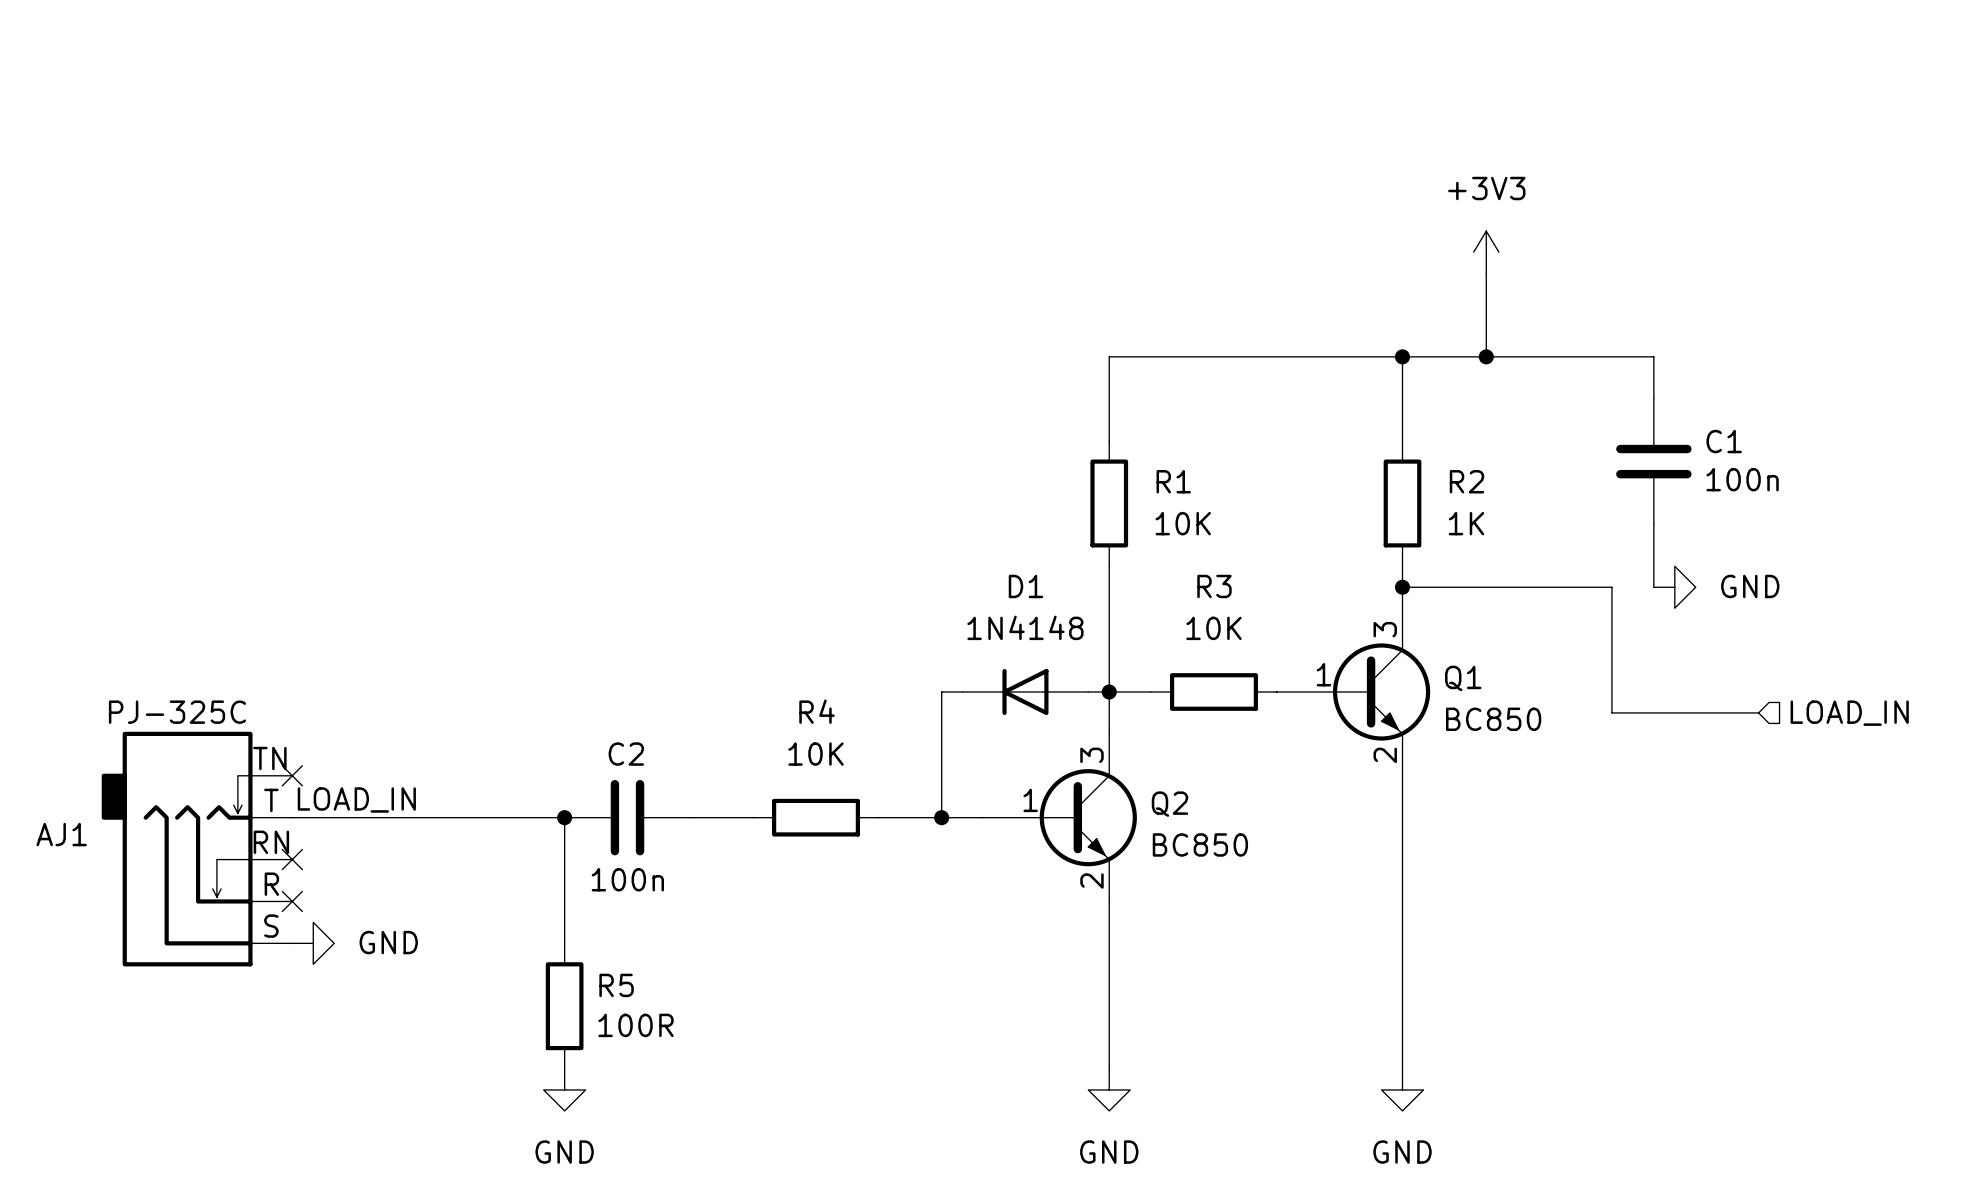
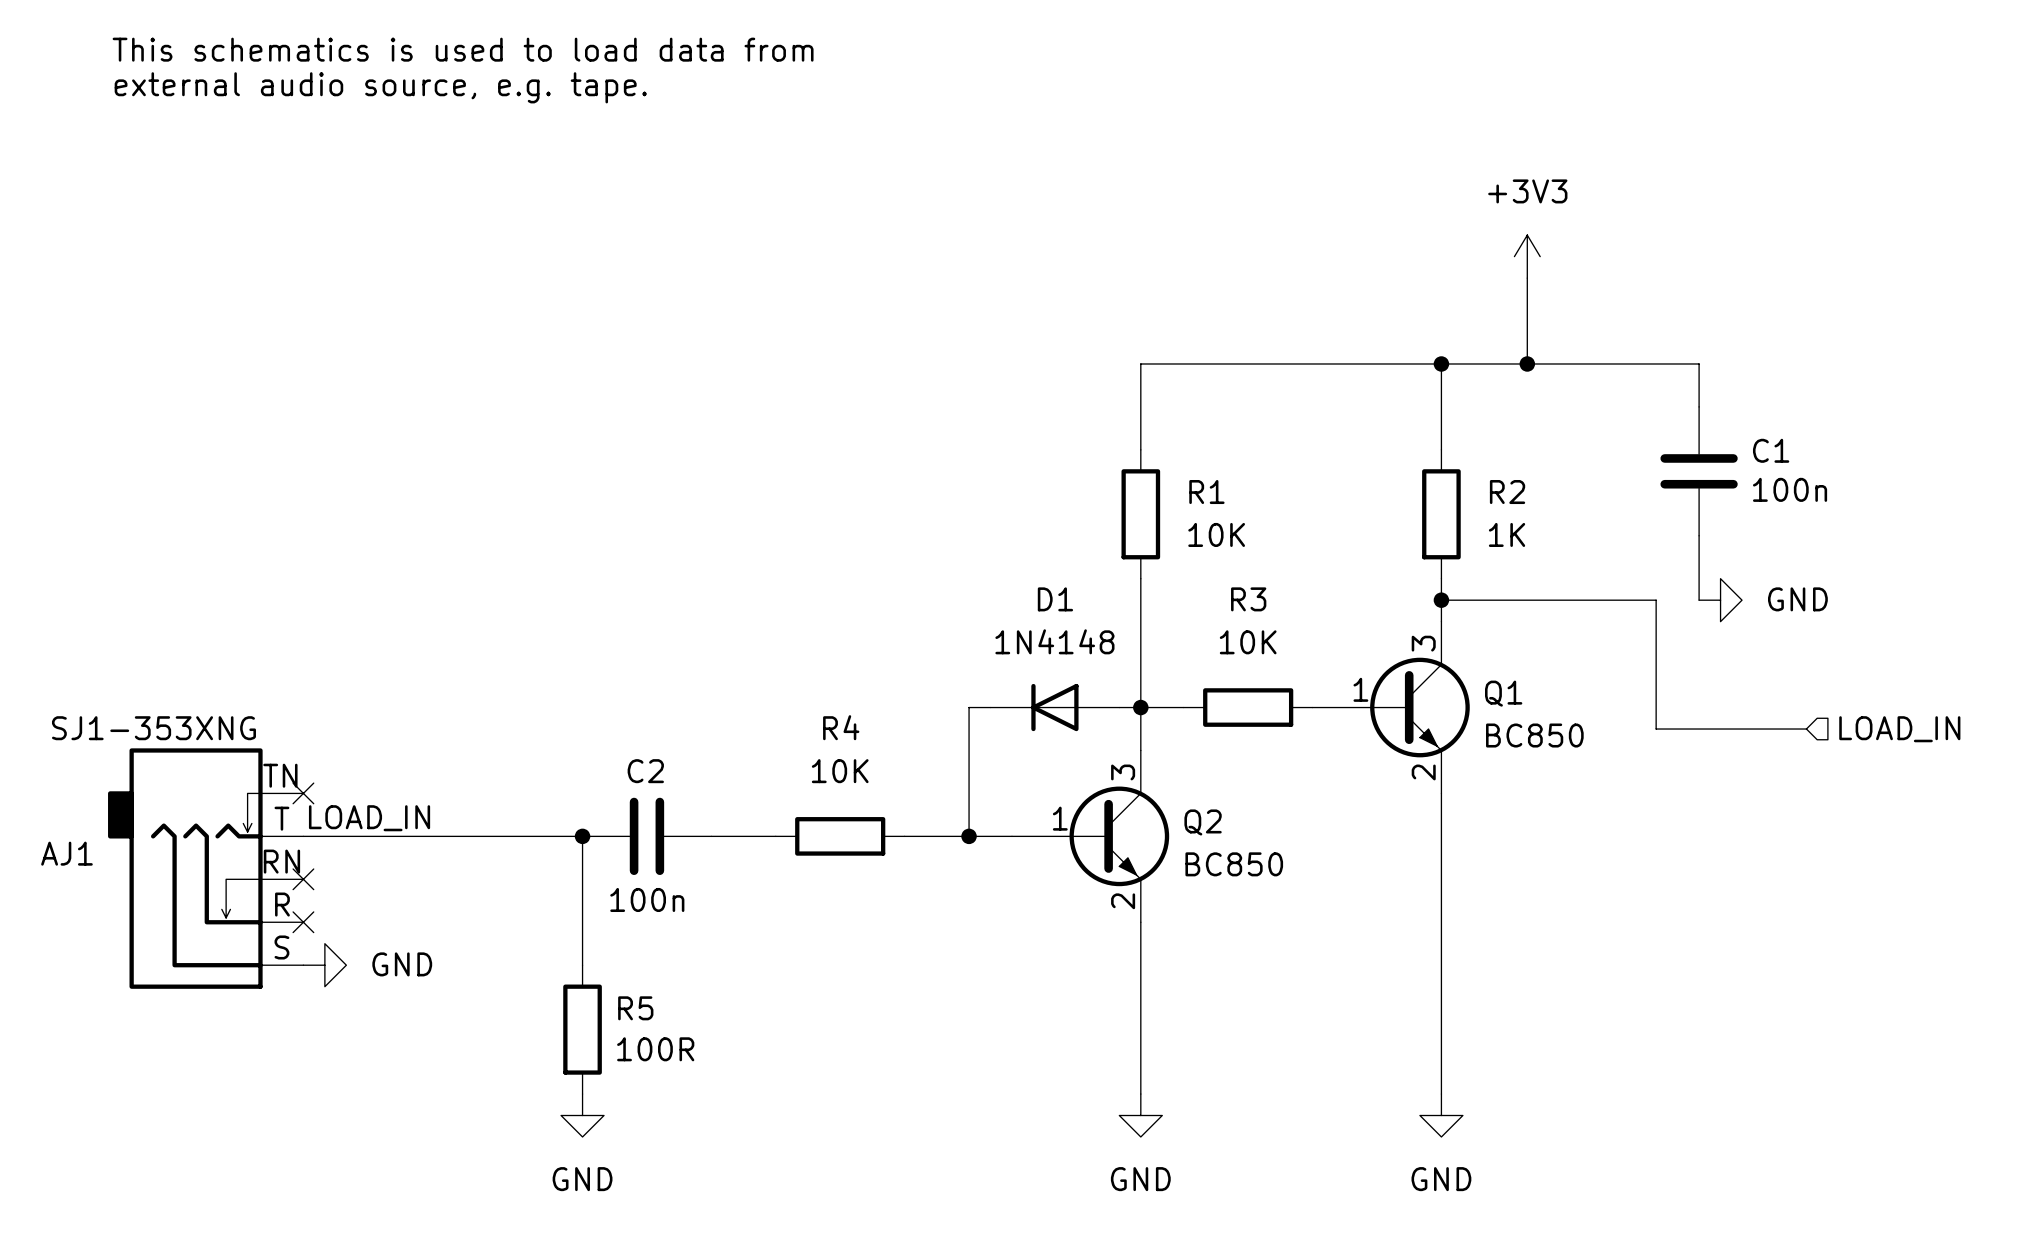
text: none -> This schematics is used to load data from (463, 49)
text: none -> external audio source, e.g. tape. (380, 87)
AJ1 value: PJ-325C (177, 712) -> SJ1-353XNG (153, 728)

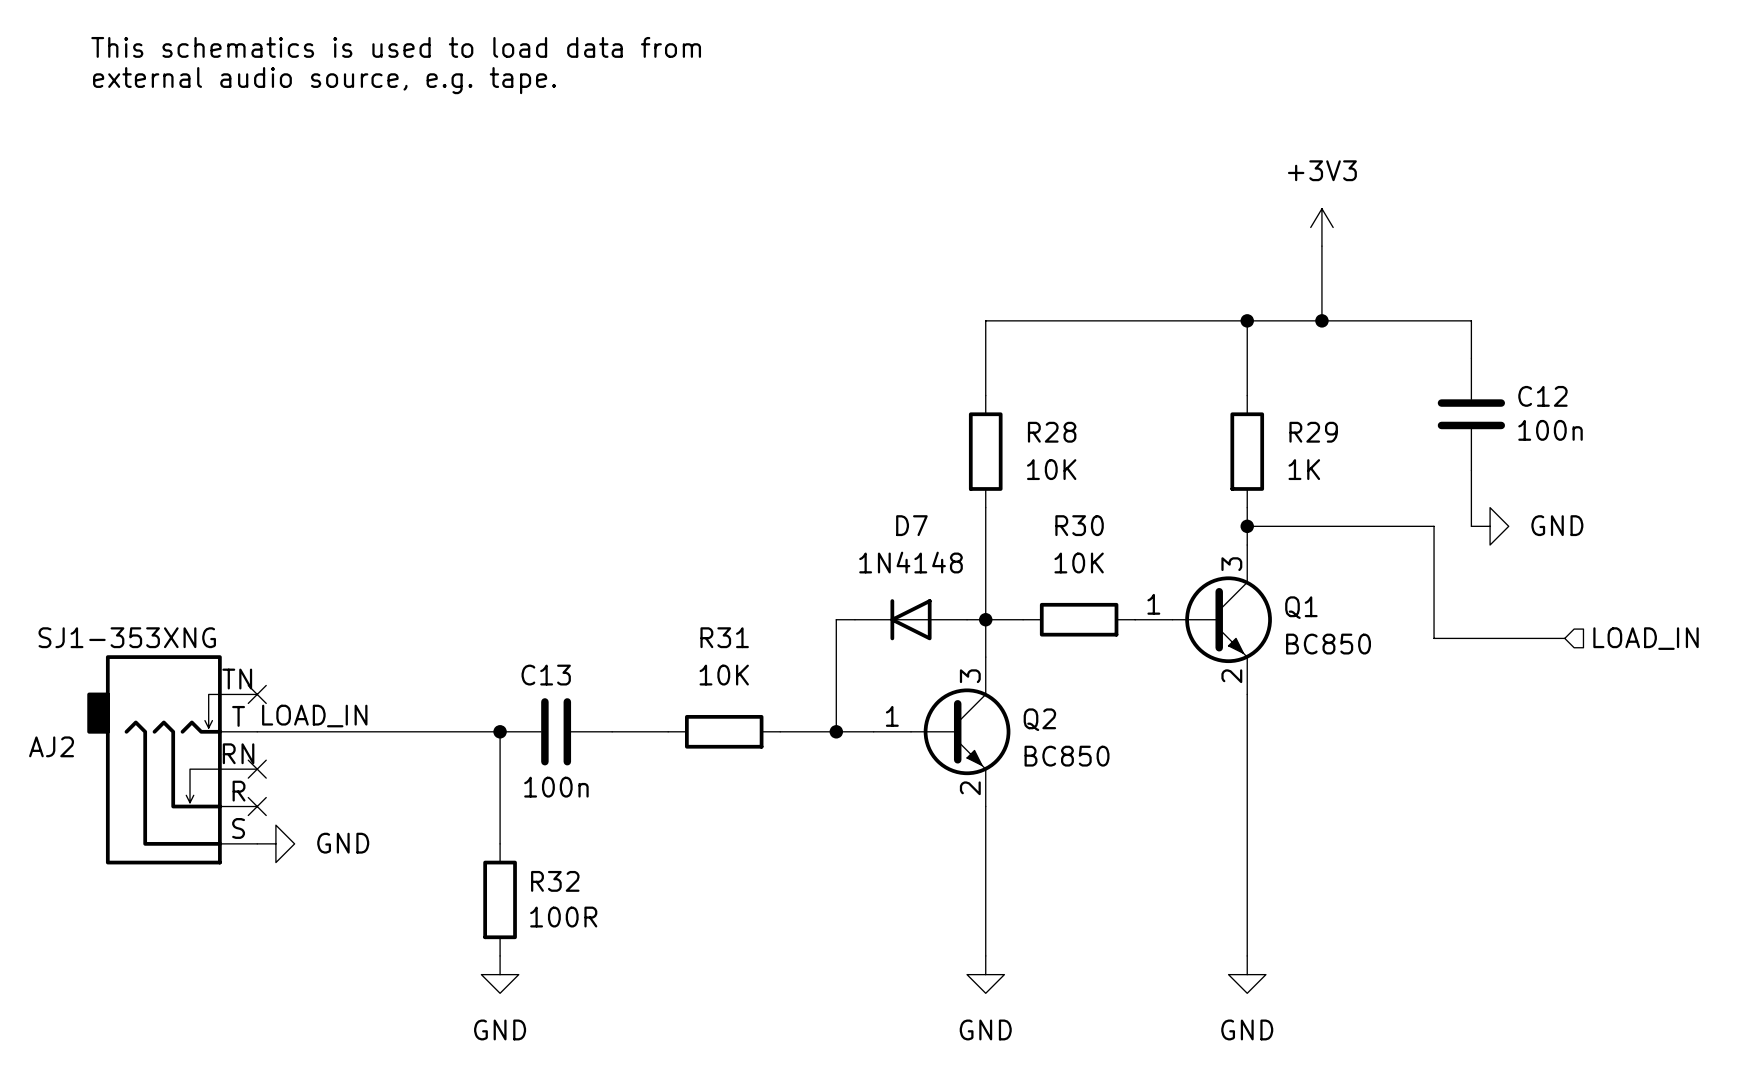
C1 name: C1 (1771, 450) -> C12 (1542, 396)
R1 name: R1 (1206, 492) -> R28 (1052, 432)
R2 name: R2 (1507, 492) -> R29 (1313, 432)
D1 name: D1 (1055, 599) -> D7 (911, 525)
R3 name: R3 (1248, 599) -> R30 (1079, 525)
Q1 symbol: [1312, 621, 1470, 794] -> [1135, 545, 1272, 695]
R4 name: R4 (841, 727) -> R31 (724, 637)
Q2 symbol: [1011, 750, 1170, 923] -> [873, 657, 1011, 807]
C2 name: C2 (645, 771) -> C13 (546, 675)
AJ1 name: AJ1 (66, 853) -> AJ2 (51, 746)
R5 name: R5 (635, 1008) -> R32 (555, 881)

